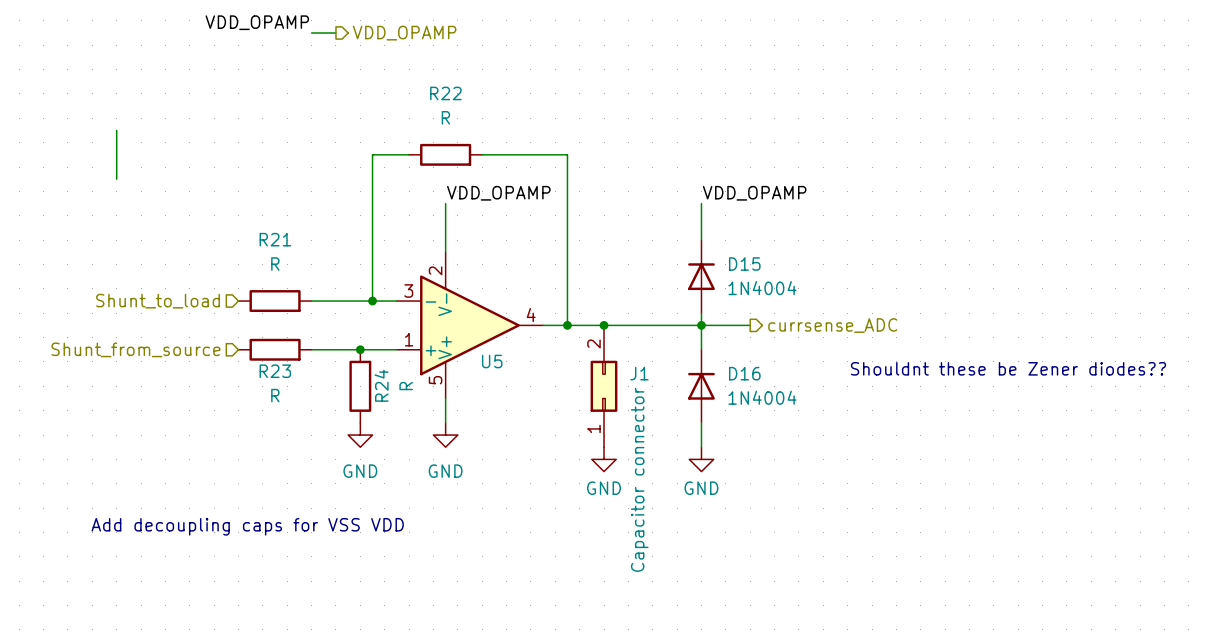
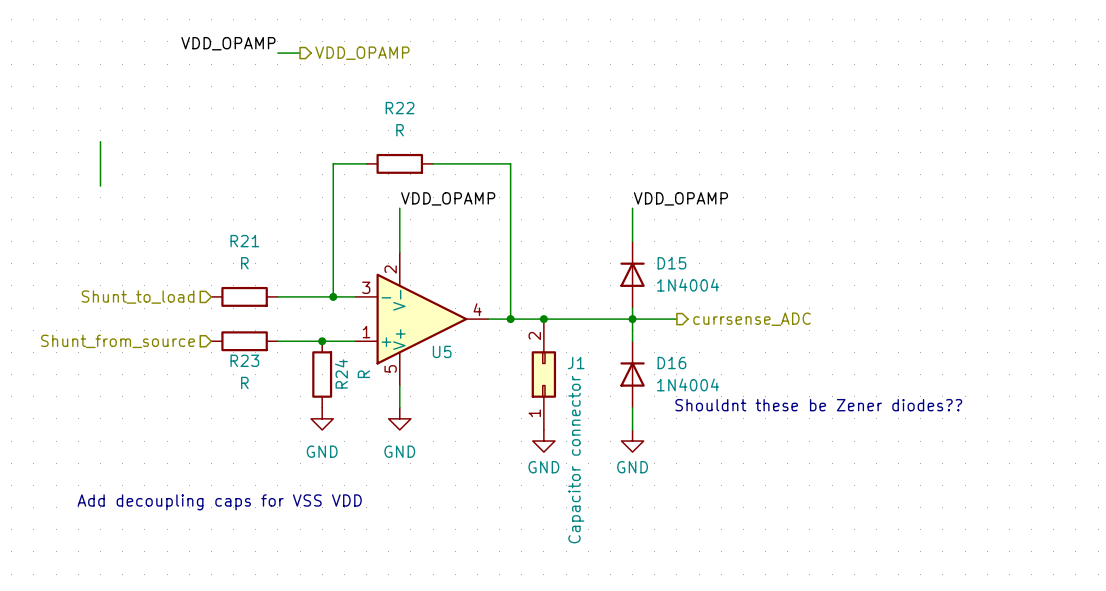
text position: Shouldnt these be Zener diodes?? (1008, 368) -> Shouldnt these be Zener diodes?? (818, 405)

